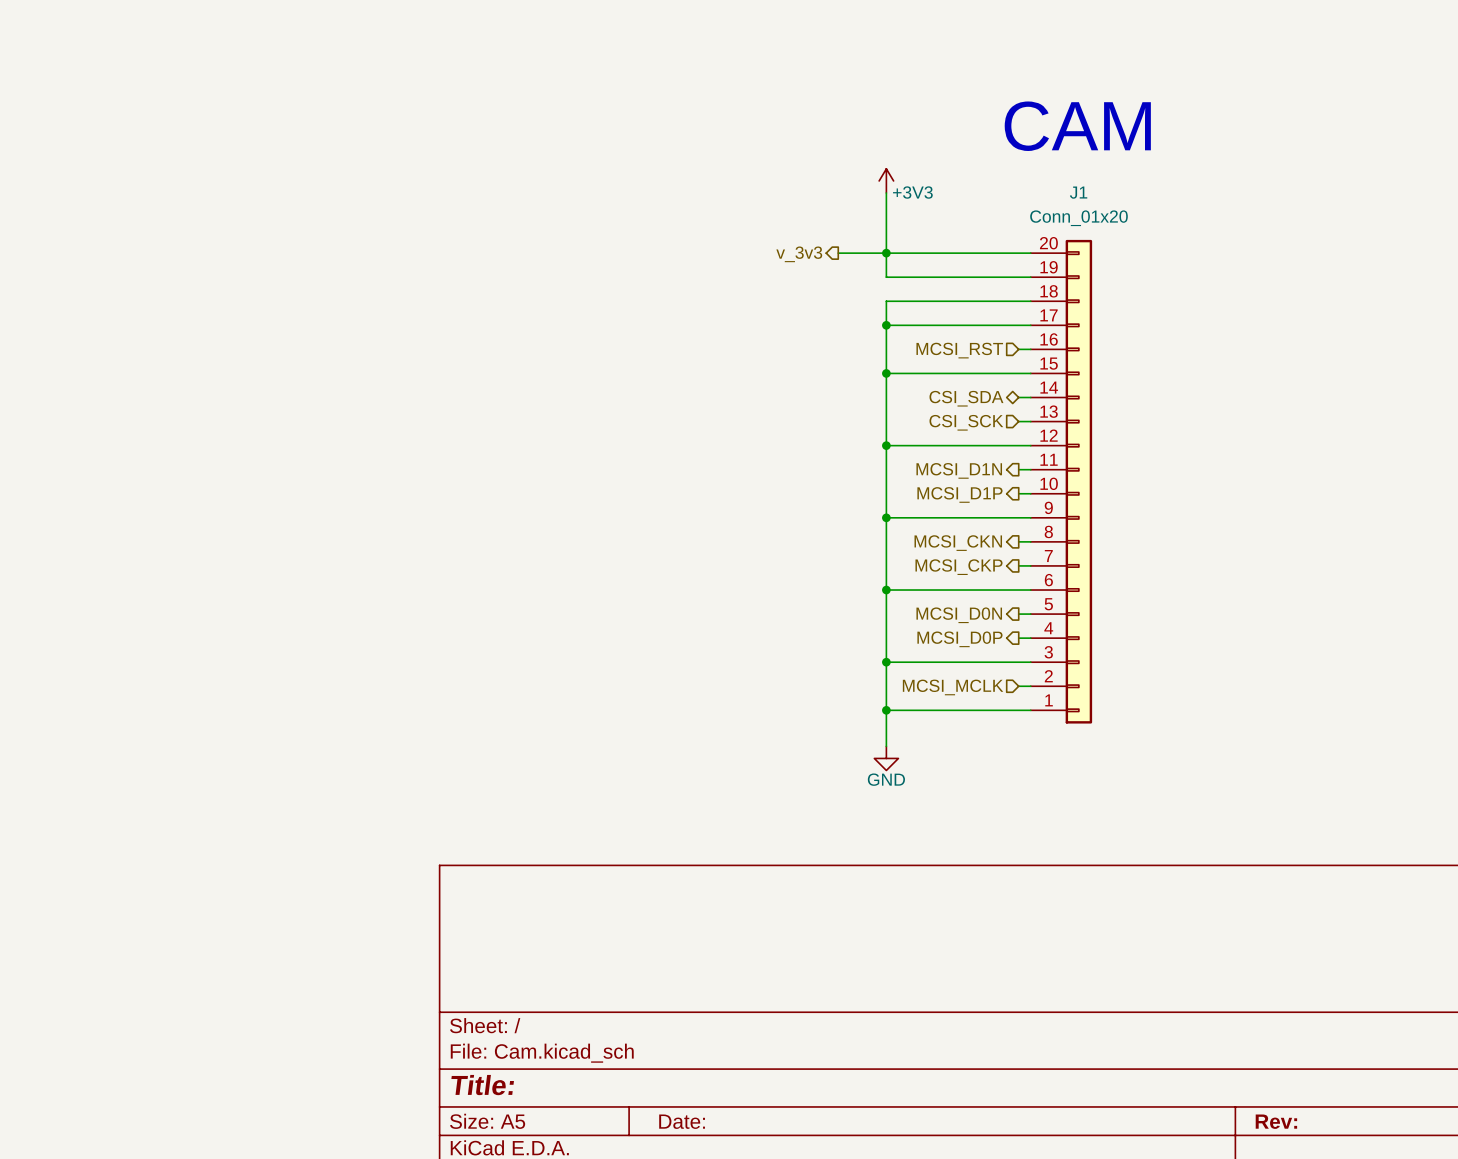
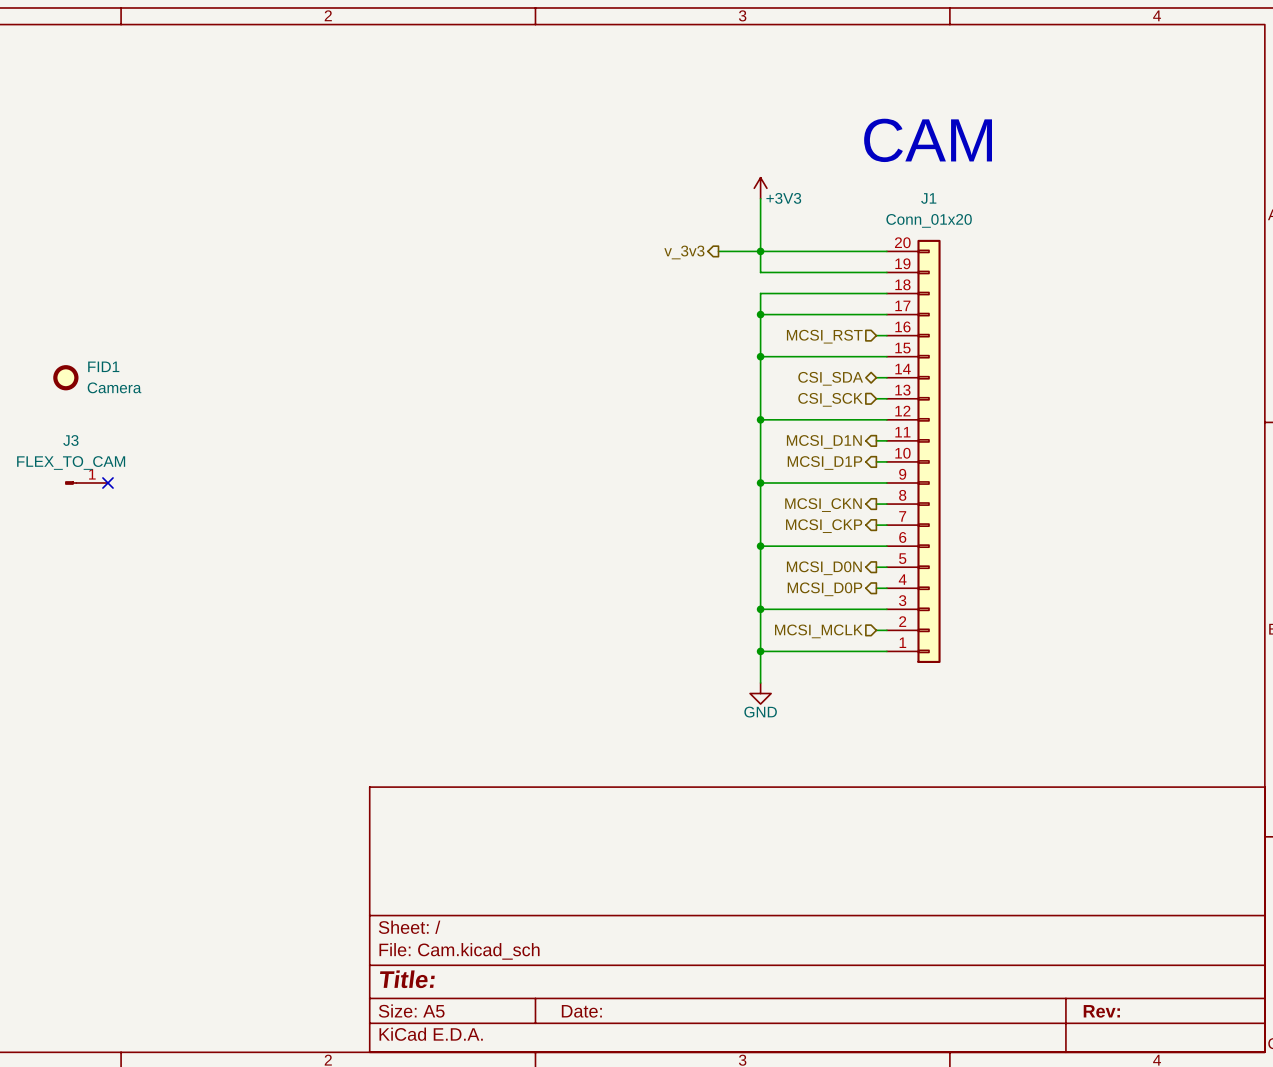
FID1: none -> Camera (65, 377)
J3: none -> FLEX_TO_CAM (86, 482)
no-connect mark: none -> (107, 482)

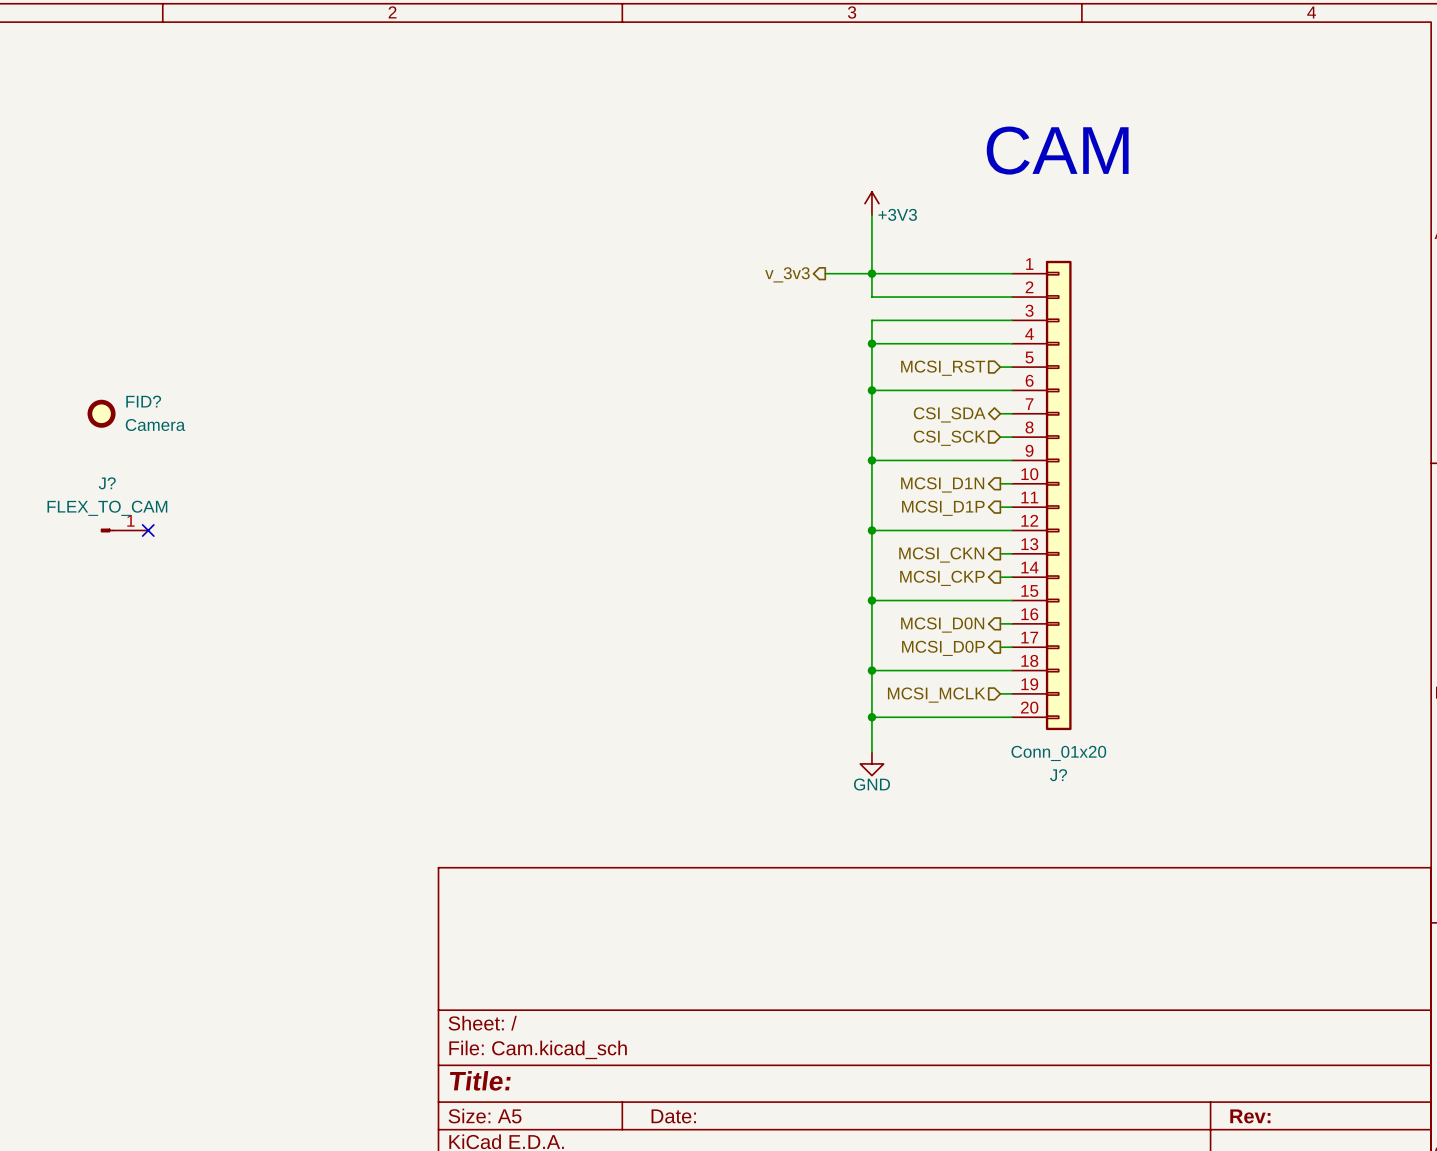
J1 name: J1 (928, 198) -> J? (1058, 775)
FID1 name: FID1 (103, 366) -> FID? (143, 401)
J3 name: J3 (70, 440) -> J? (107, 483)
J1 flip: as is (929, 451) -> up-down (1058, 495)

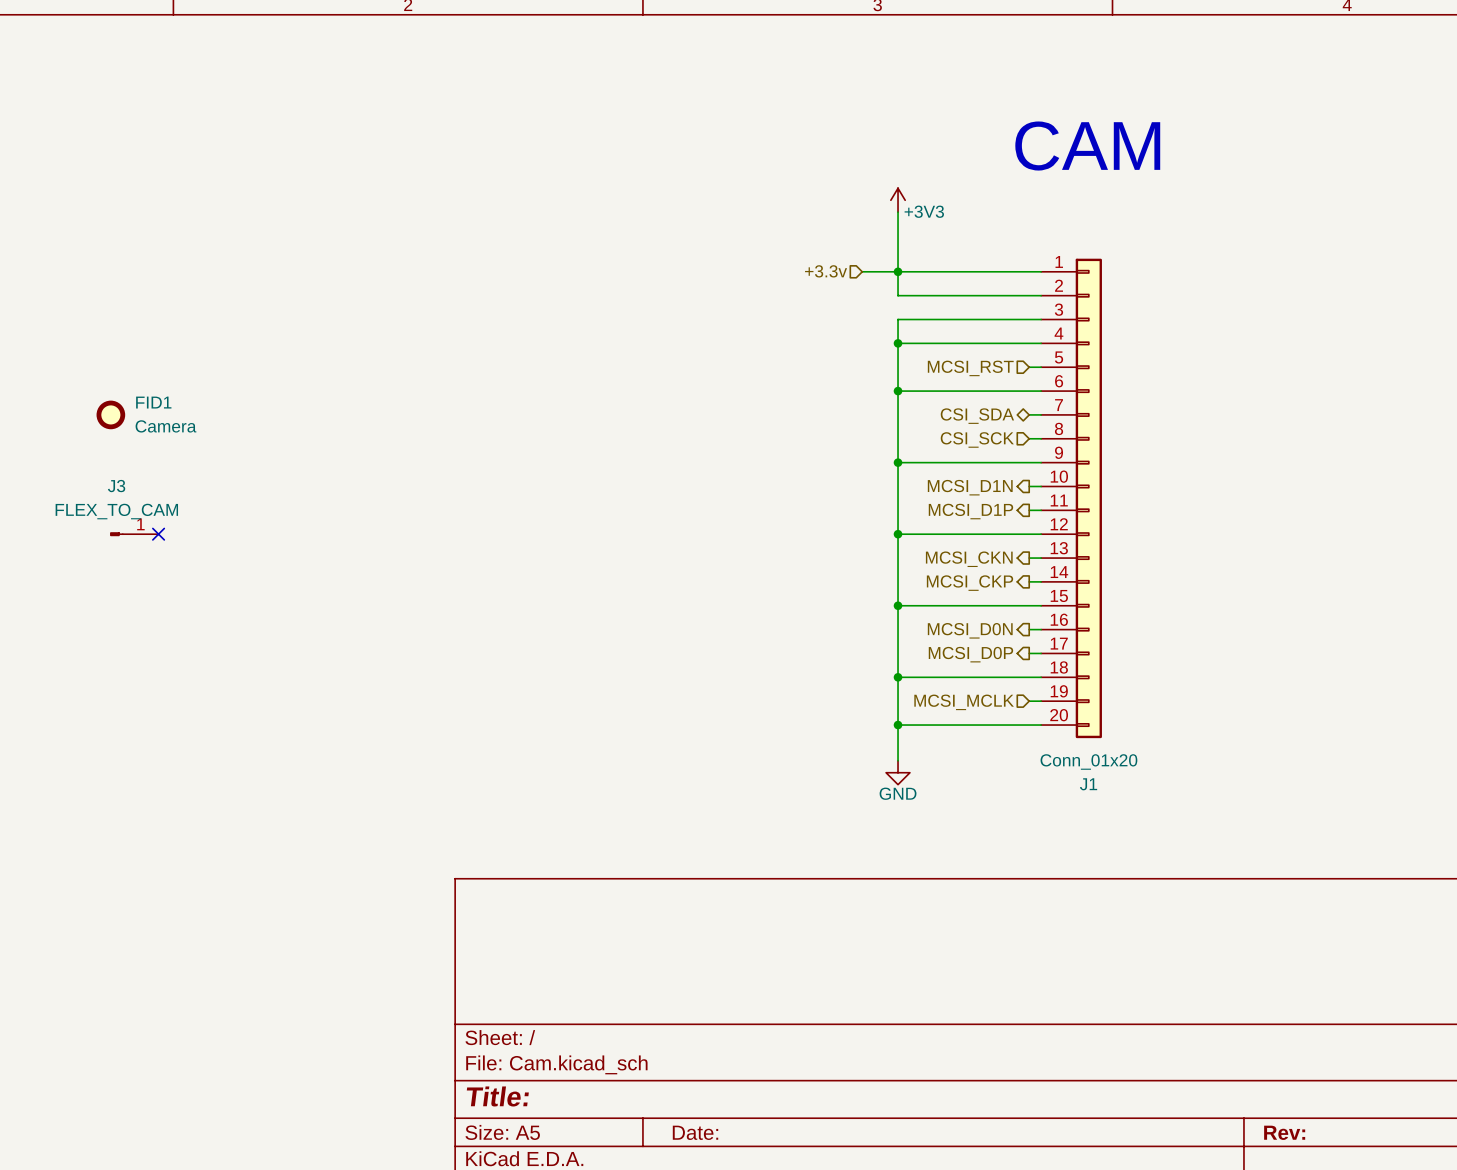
hierarchical label: none -> +3.3v (826, 271)
wire: (825, 273) (836, 273) -> none
hierarchical label: v_3v3 (787, 274) -> none
FID? name: FID? (143, 401) -> FID1 (153, 402)
J? name: J? (107, 483) -> J3 (116, 486)
J? name: J? (1058, 775) -> J1 (1088, 784)

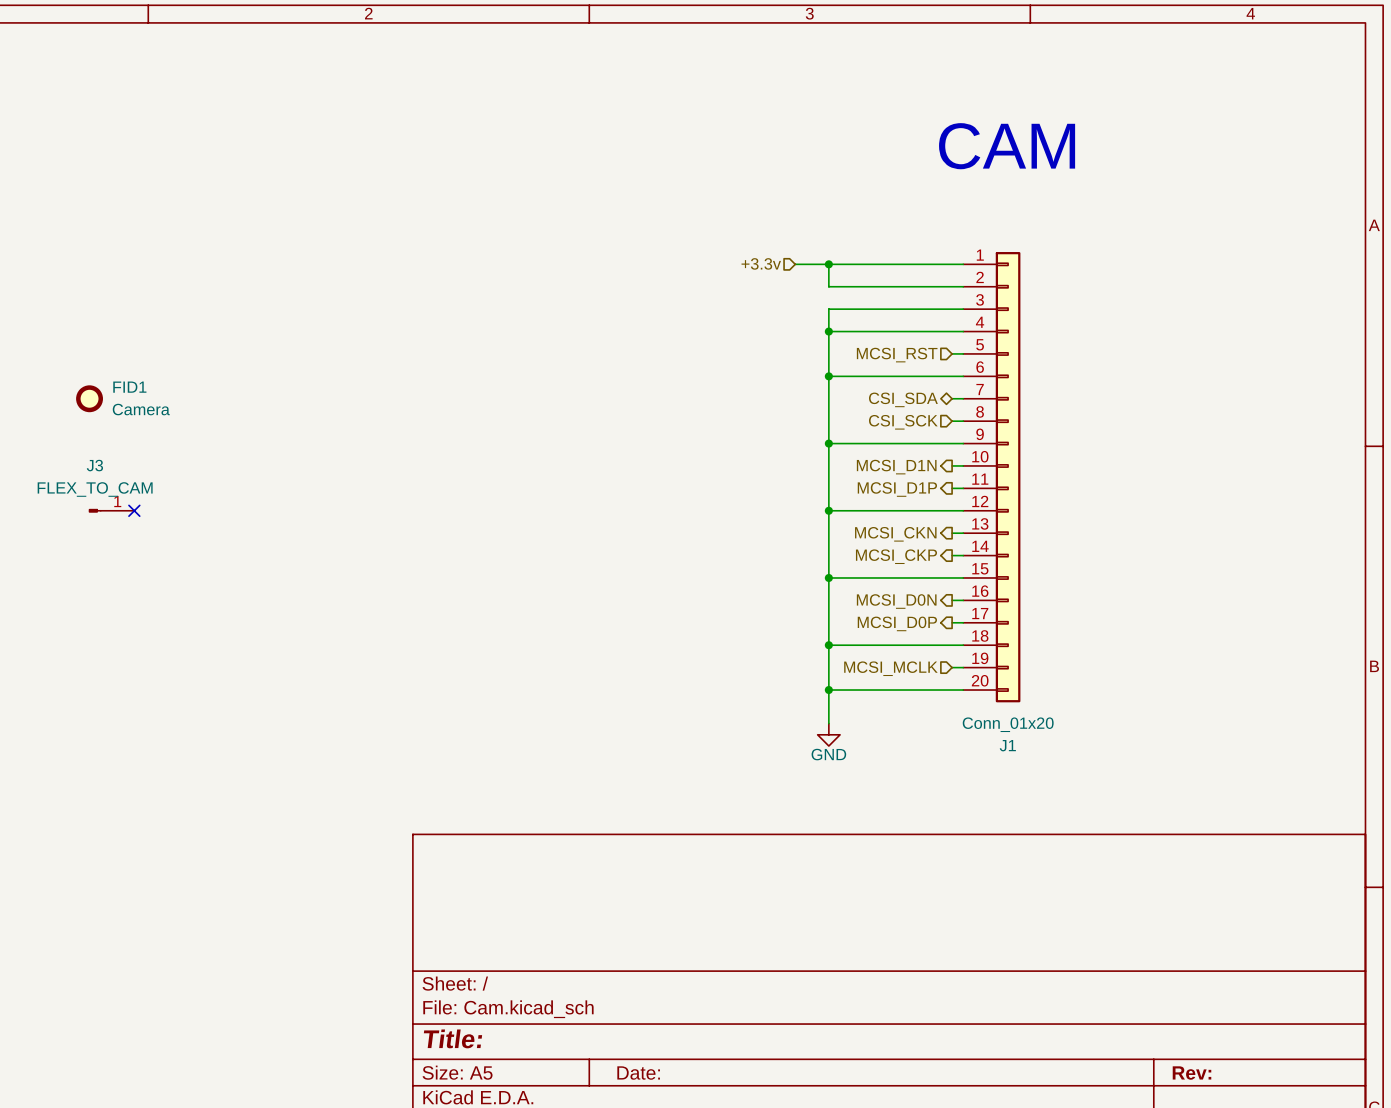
power symbol: +3V3 (898, 200) -> none
wire: (898, 212) (898, 271) -> none

